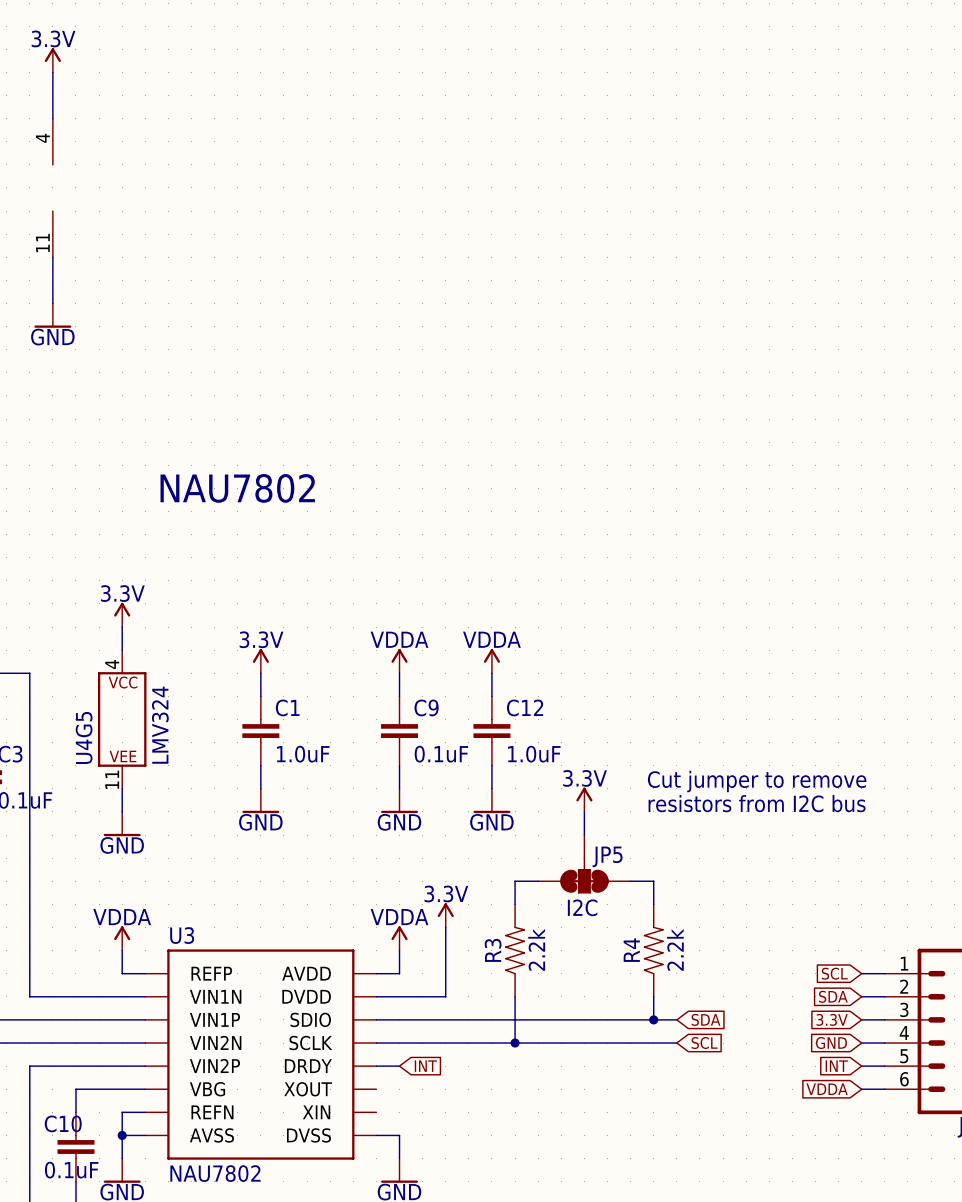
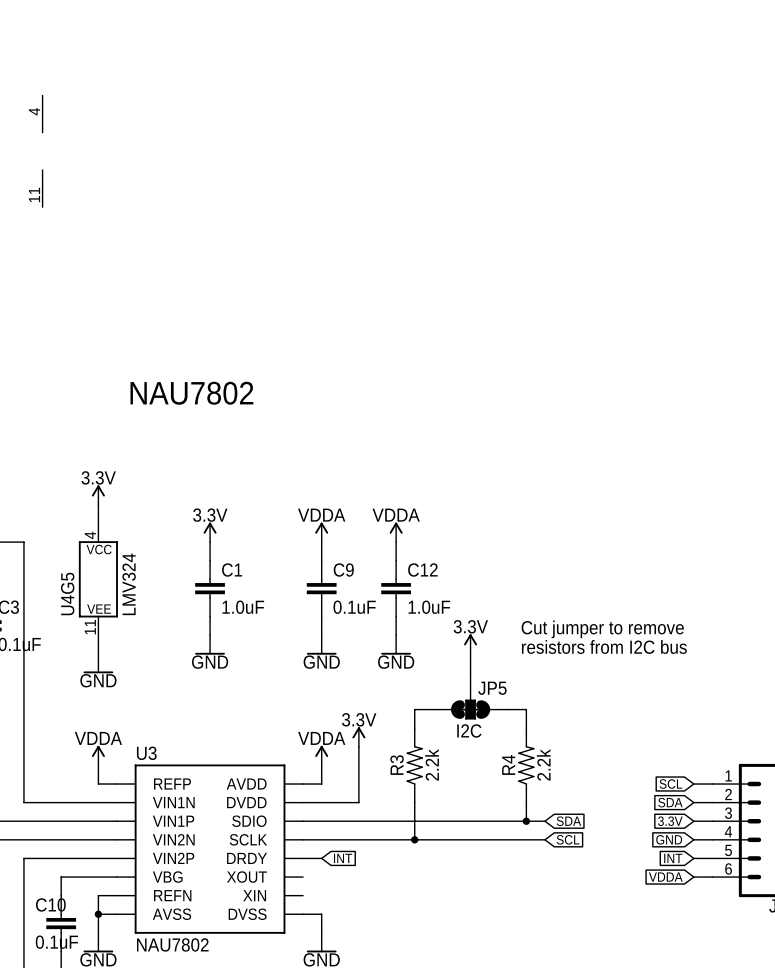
power symbol: 3.3V (52, 60) -> none
wire: (52, 72) (52, 118) -> none
wire: (52, 257) (52, 303) -> none
power symbol: GND (52, 315) -> none

